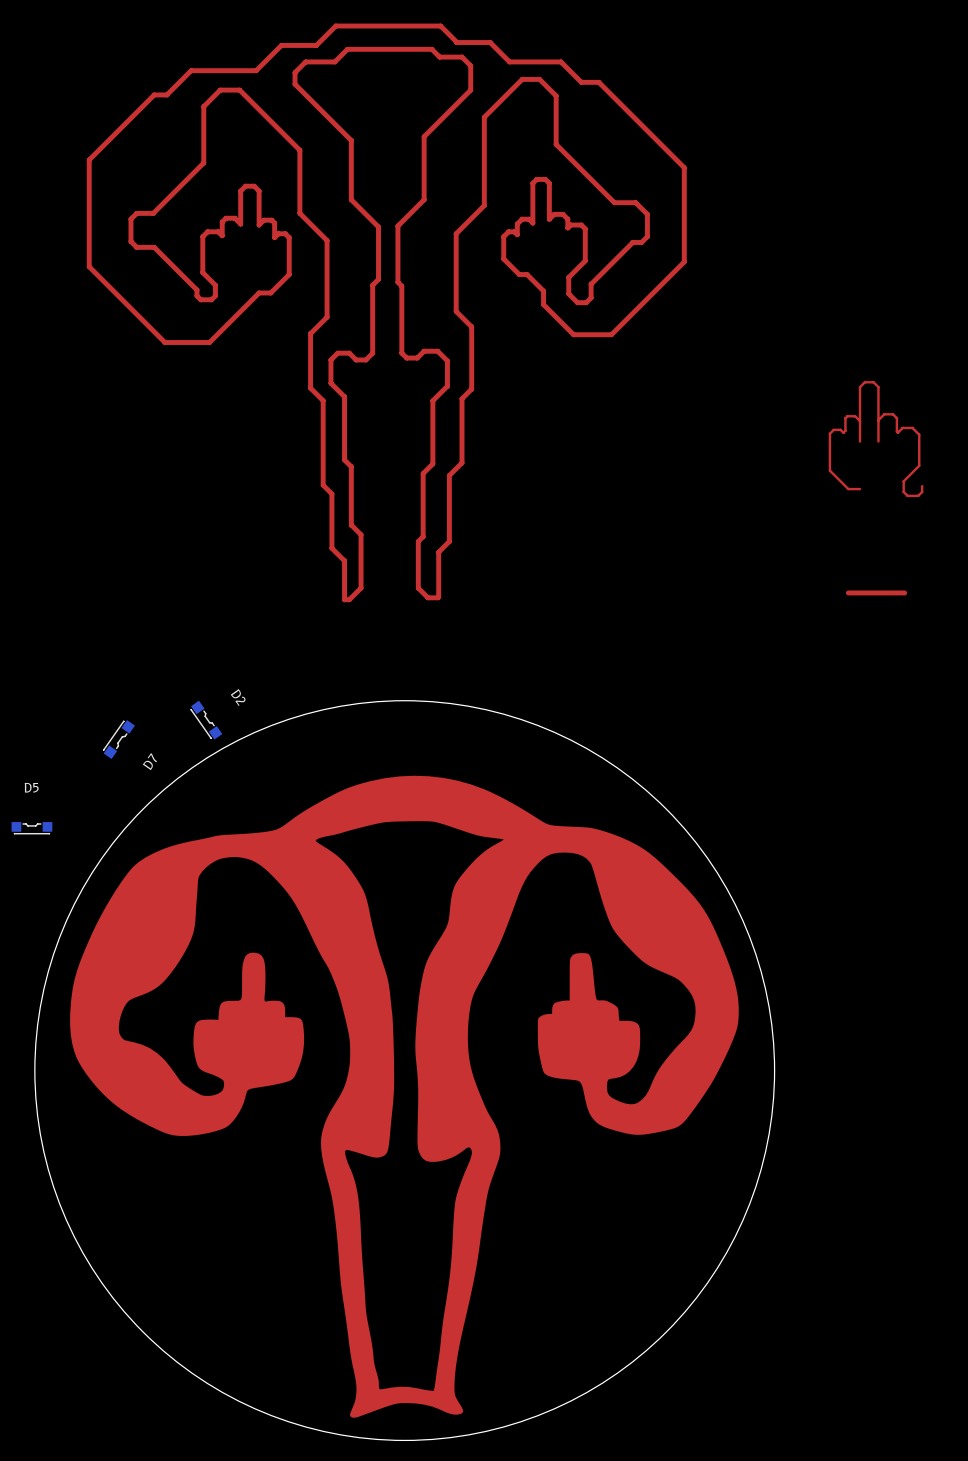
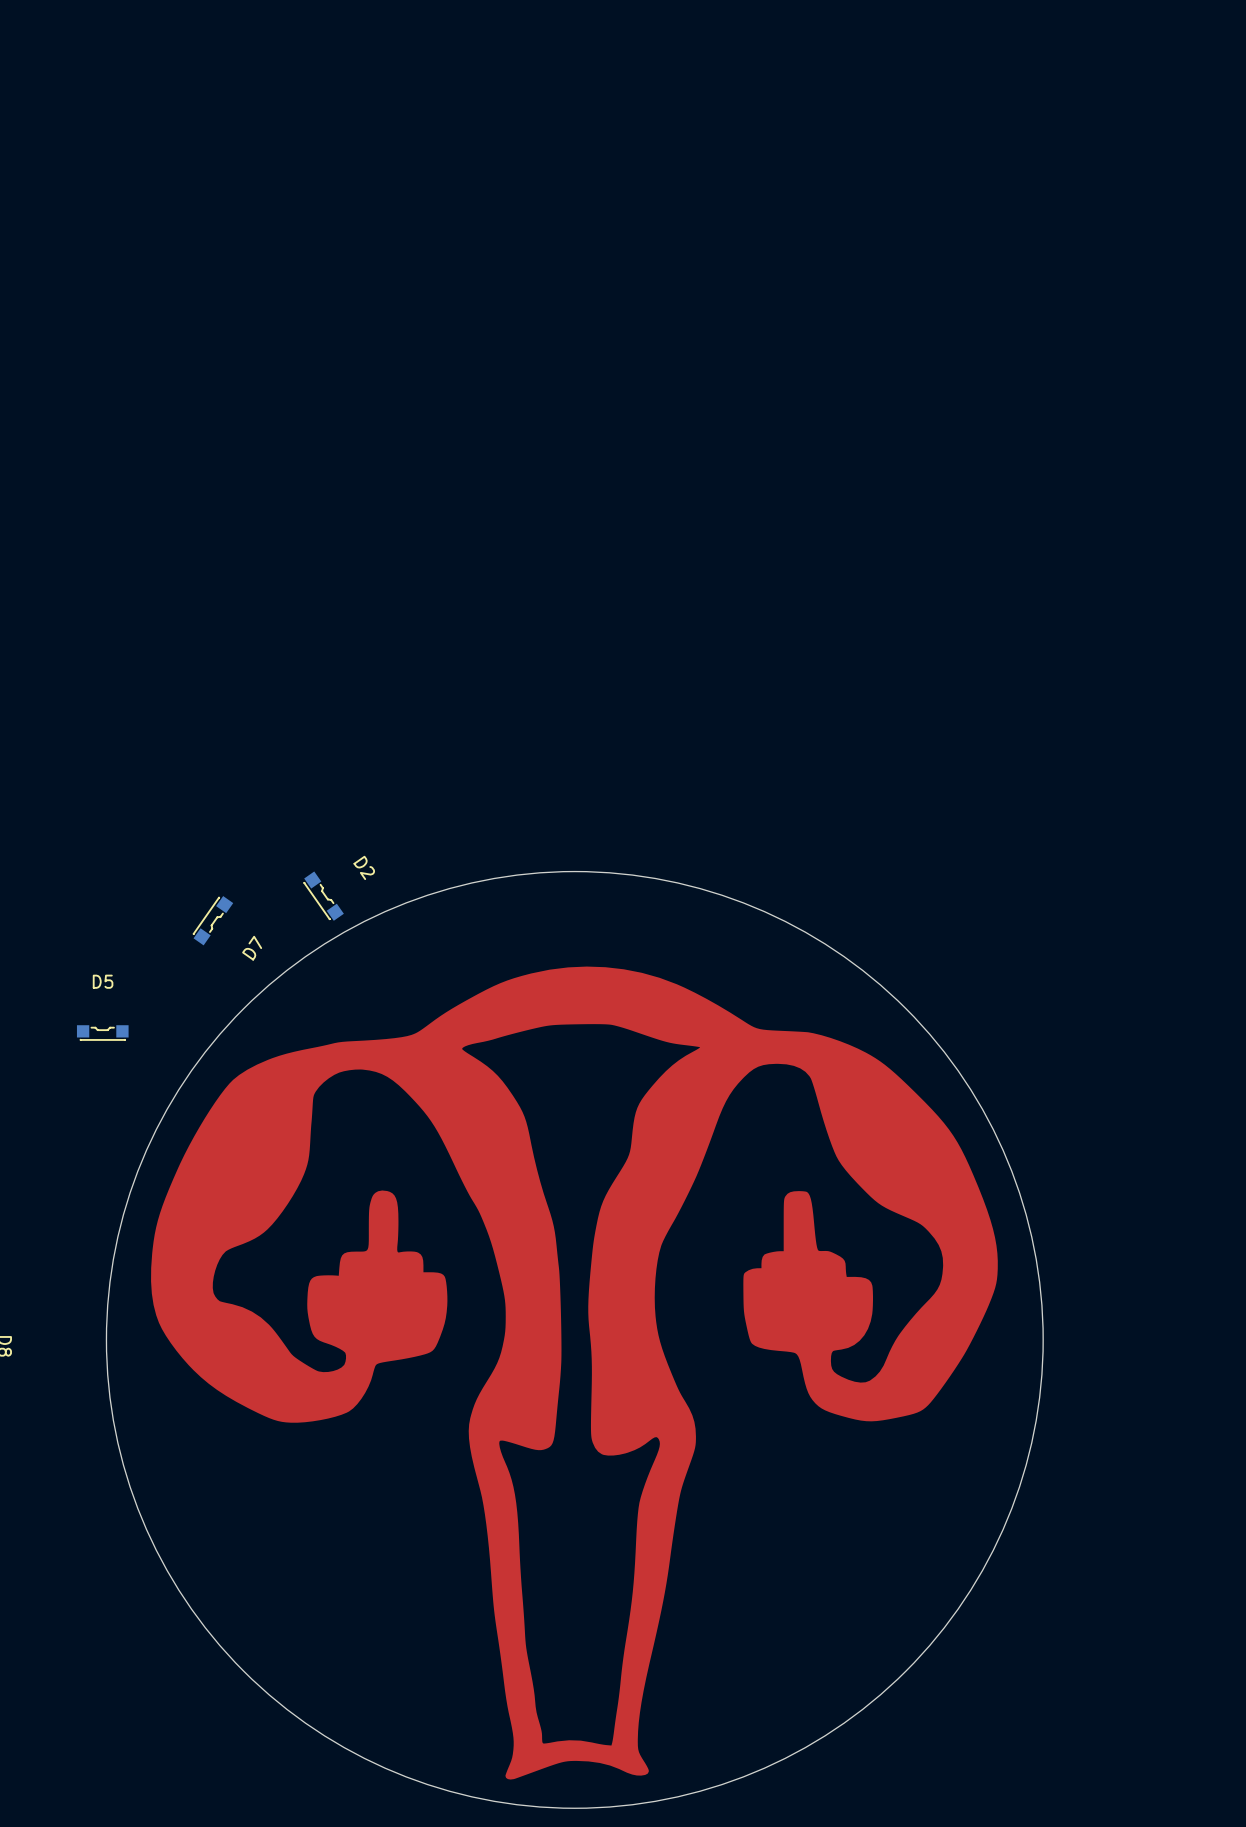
top track: (457, 42) (440, 26) (335, 26) (316, 45) (281, 45) (256, 70) (191, 70) (166, 94) (154, 94) (89, 159) (89, 266) (164, 342) (209, 342) (259, 292) (270, 292) (289, 274) (289, 237) (285, 233) (278, 233) (274, 237) (274, 223) (271, 220) (263, 220) (259, 225) (259, 191) (254, 186) (245, 186) (240, 191) (240, 224) (234, 218) (226, 218) (222, 222) (222, 235) (218, 231) (207, 231) (202, 236) (202, 272) (215, 285) (215, 295) (211, 299) (200, 299) (196, 295) (196, 290) (154, 247) (136, 247) (130, 241) (130, 219) (136, 213) (153, 213) (203, 162) (203, 106) (220, 90) (239, 90) (299, 150) (299, 213) (327, 240) (327, 317) (310, 333) (310, 388) (323, 400) (323, 485) (331, 493) (331, 548) (344, 560) (344, 599) (349, 599) (361, 588) (361, 534) (351, 525) (351, 466) (344, 459) (344, 396) (330, 383) (330, 359) (337, 353) (349, 353) (356, 359) (365, 359) (372, 353) (372, 285) (378, 279) (378, 226) (351, 199) (351, 140) (295, 84) (295, 72) (305, 61) (334, 61) (347, 49) (431, 49) (439, 57) (462, 57) (470, 65) (470, 90) (424, 136) (424, 199) (397, 226) (397, 282) (401, 286) (401, 353) (406, 358) (417, 358) (424, 351) (437, 351) (447, 360) (447, 386) (432, 400) (432, 463) (423, 473) (423, 536) (418, 541) (418, 588) (428, 597) (438, 596) (438, 552) (449, 541) (449, 475) (462, 462) (462, 398) (471, 389) (471, 326) (456, 311) (456, 233) (484, 205) (484, 117) (522, 79) (539, 79) (556, 95) (556, 144) (614, 202) (635, 202) (647, 214) (647, 236) (641, 242) (632, 242) (591, 284) (591, 297) (586, 302) (577, 302) (568, 293) (568, 277) (585, 260) (585, 228) (581, 225) (570, 225) (567, 227) (567, 219) (562, 214) (554, 214) (549, 219) (549, 183) (545, 179) (536, 179) (532, 183) (532, 223) (528, 219) (522, 219) (517, 224) (517, 234) (514, 231) (508, 231) (503, 236) (503, 259) (519, 274) (527, 274) (543, 291) (543, 304) (573, 334) (611, 334) (684, 261) (684, 167) (598, 82) (581, 82) (561, 61) (509, 61) (490, 42) (456, 42) -> none
top track: (878, 420) (884, 414) (893, 414) (896, 418) (897, 432) (902, 427) (912, 427) (919, 434) (919, 465) (903, 481) (903, 491) (907, 495) (918, 495) (922, 491) (922, 486) -> none
top track: (860, 421) (855, 416) (847, 416) (843, 432) (840, 429) (833, 429) (829, 433) (829, 470) (848, 489) (860, 489) -> none
top track: (878, 441) (878, 387) (873, 382) (864, 382) (860, 387) (860, 441) -> none
top track: (904, 592) (848, 592) -> none

